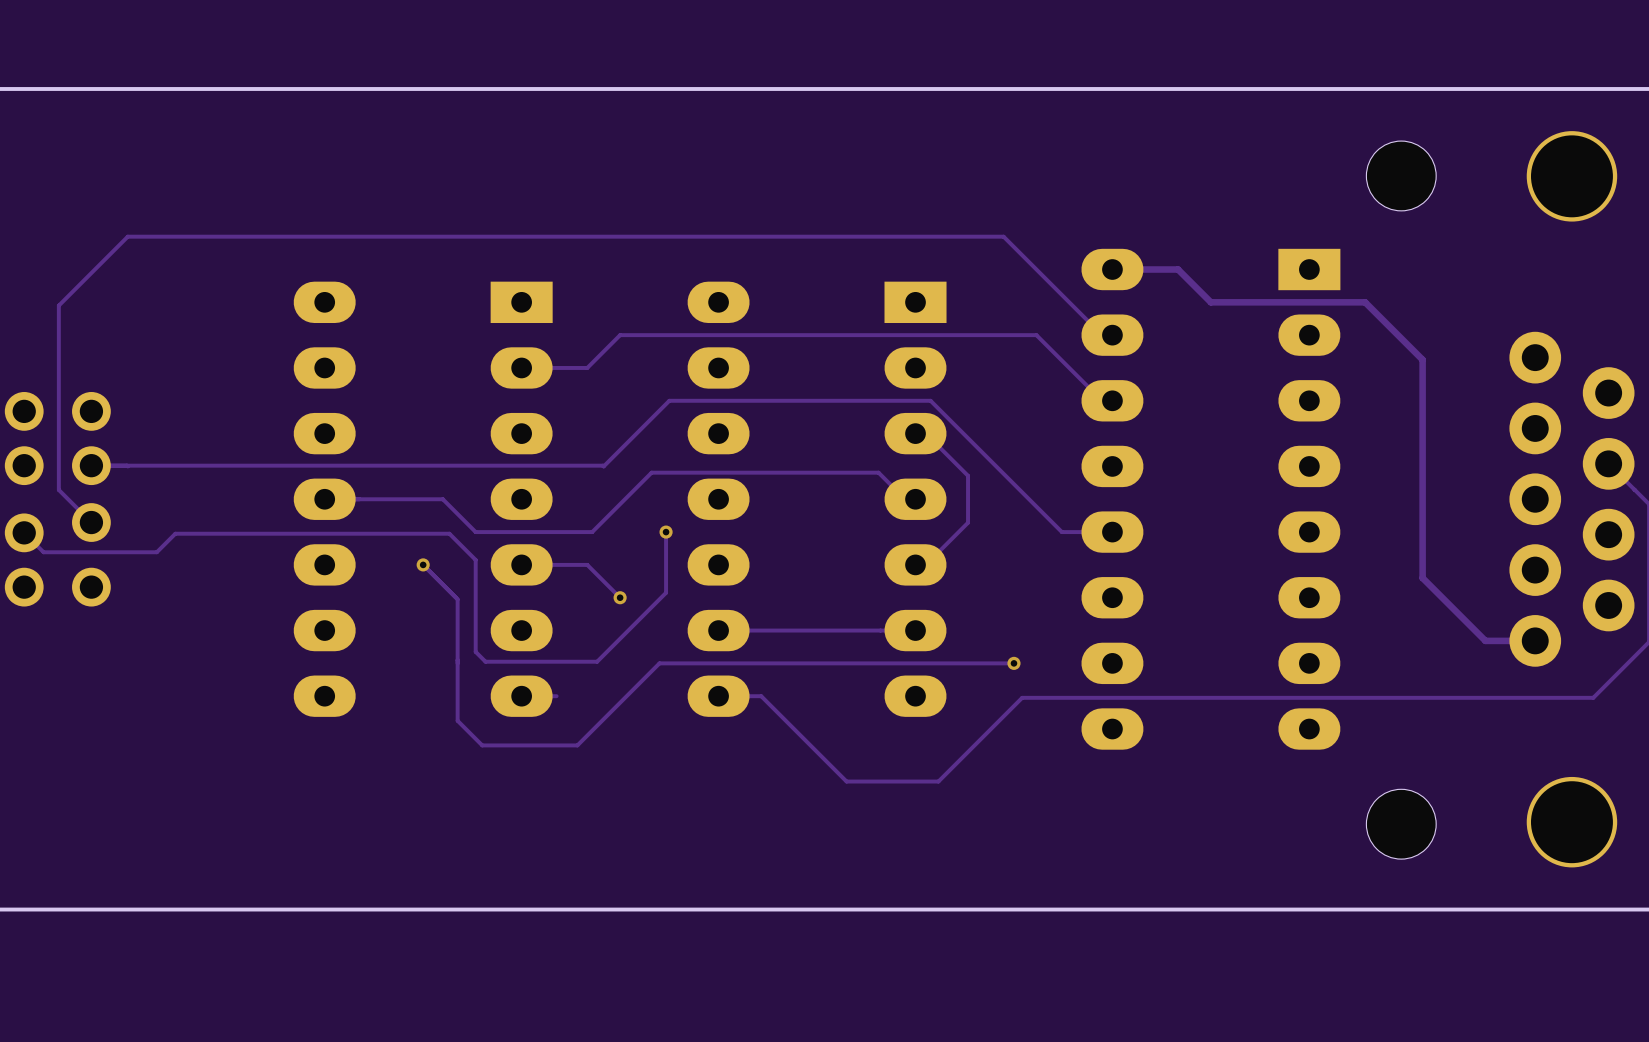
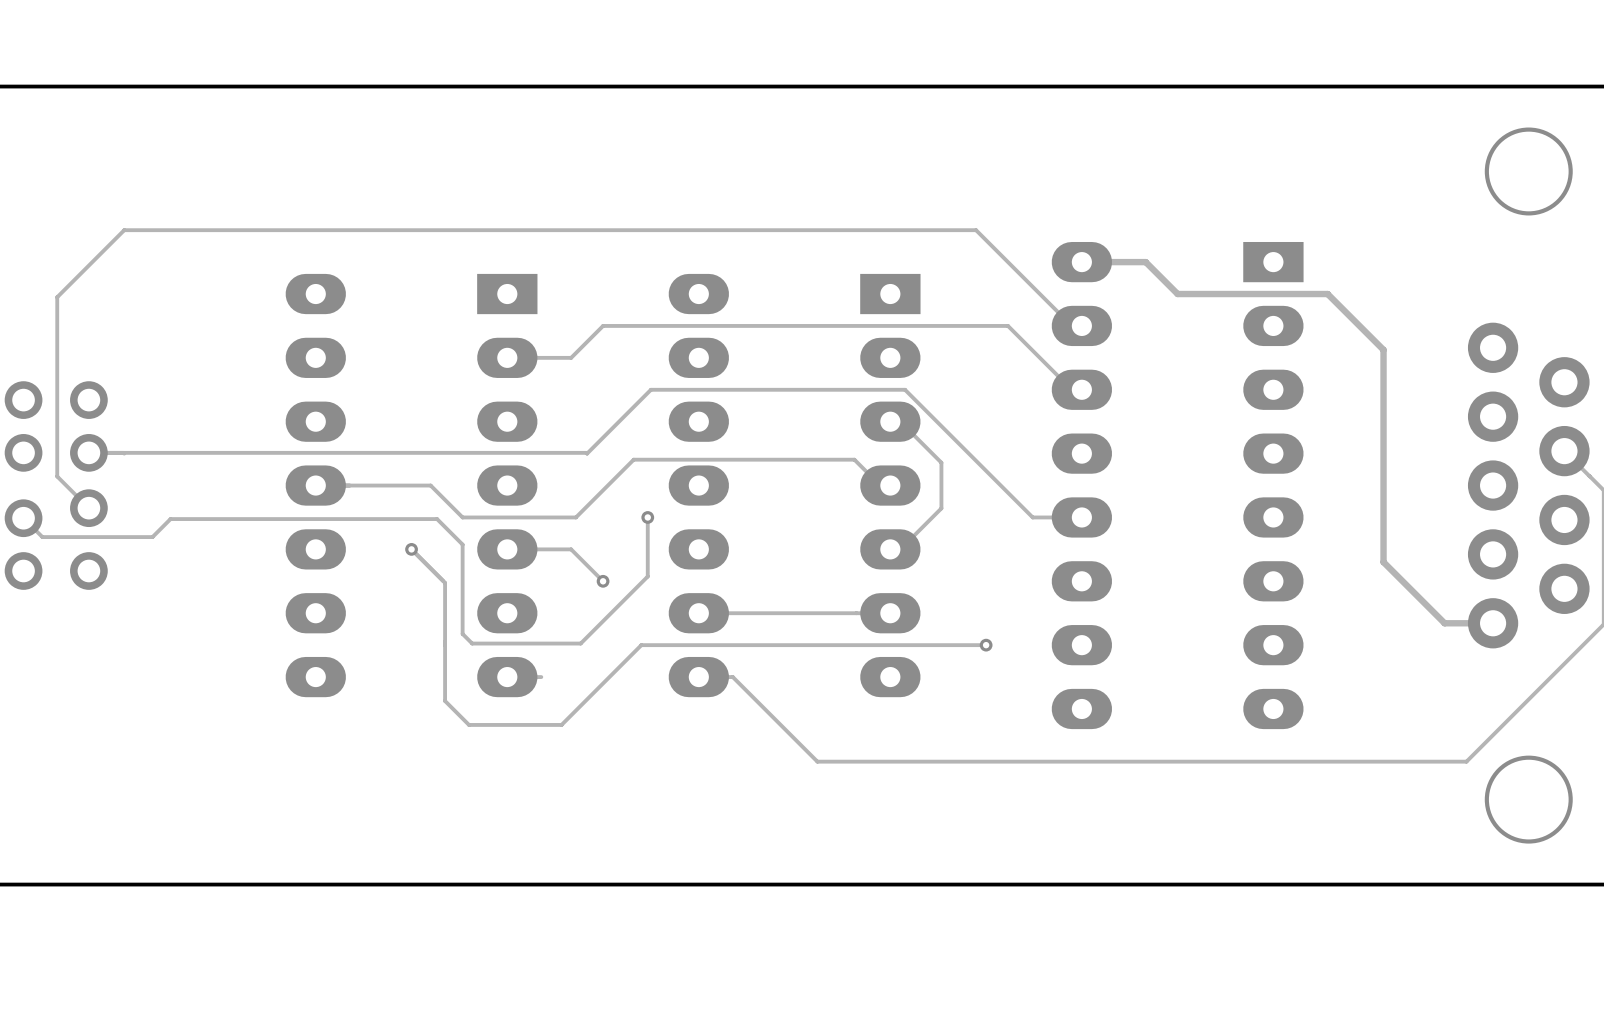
part: (1401, 175) -> none
track: (753, 696) (761, 696) (846, 781) (938, 781) (1022, 697) (1593, 697) -> (732, 677) (817, 761) (1466, 761) (1549, 678)
part: (1401, 824) -> none

